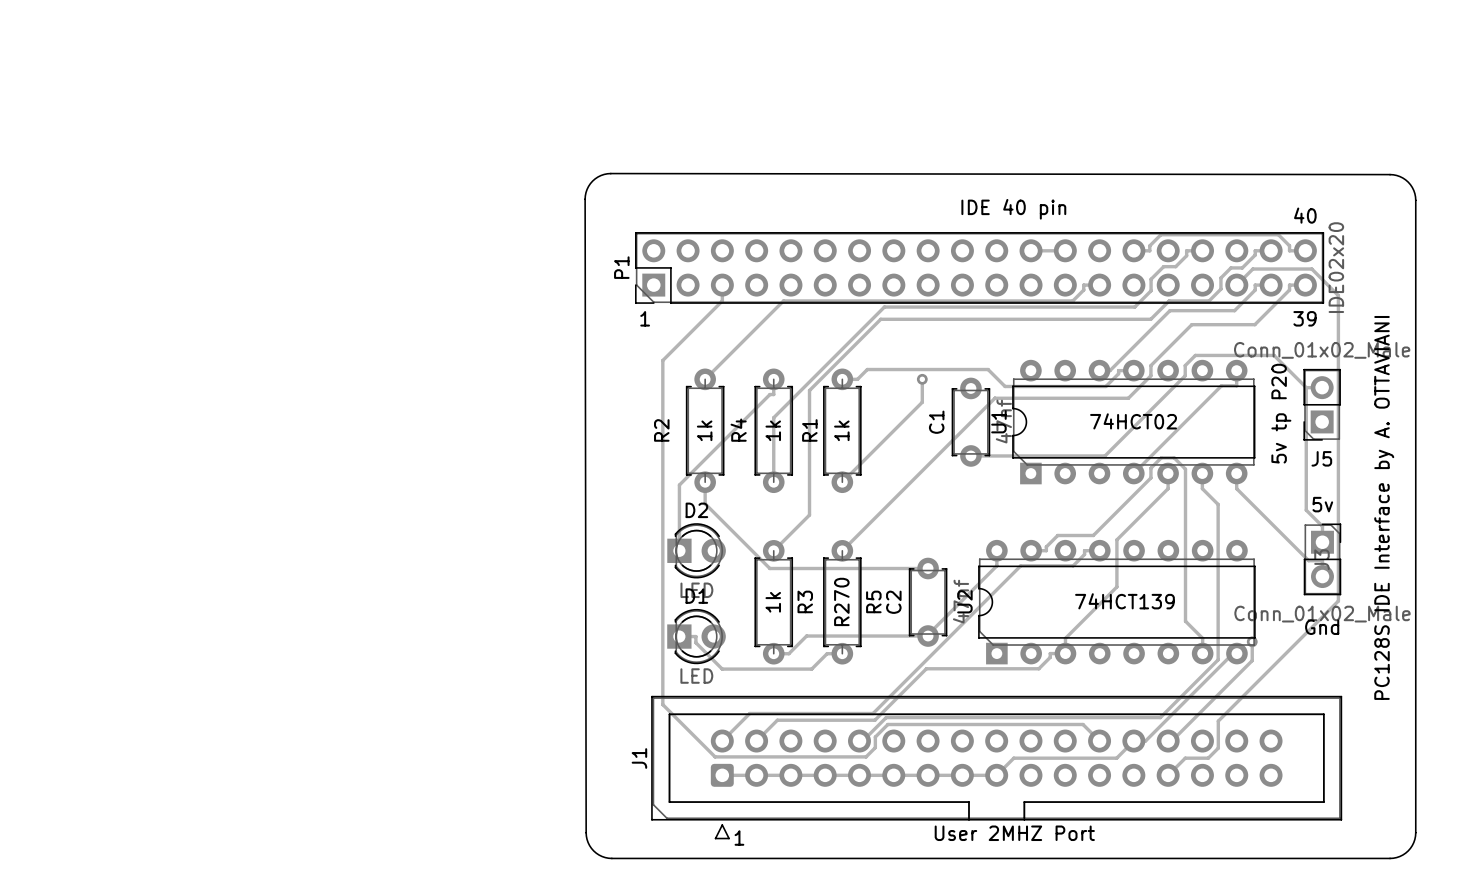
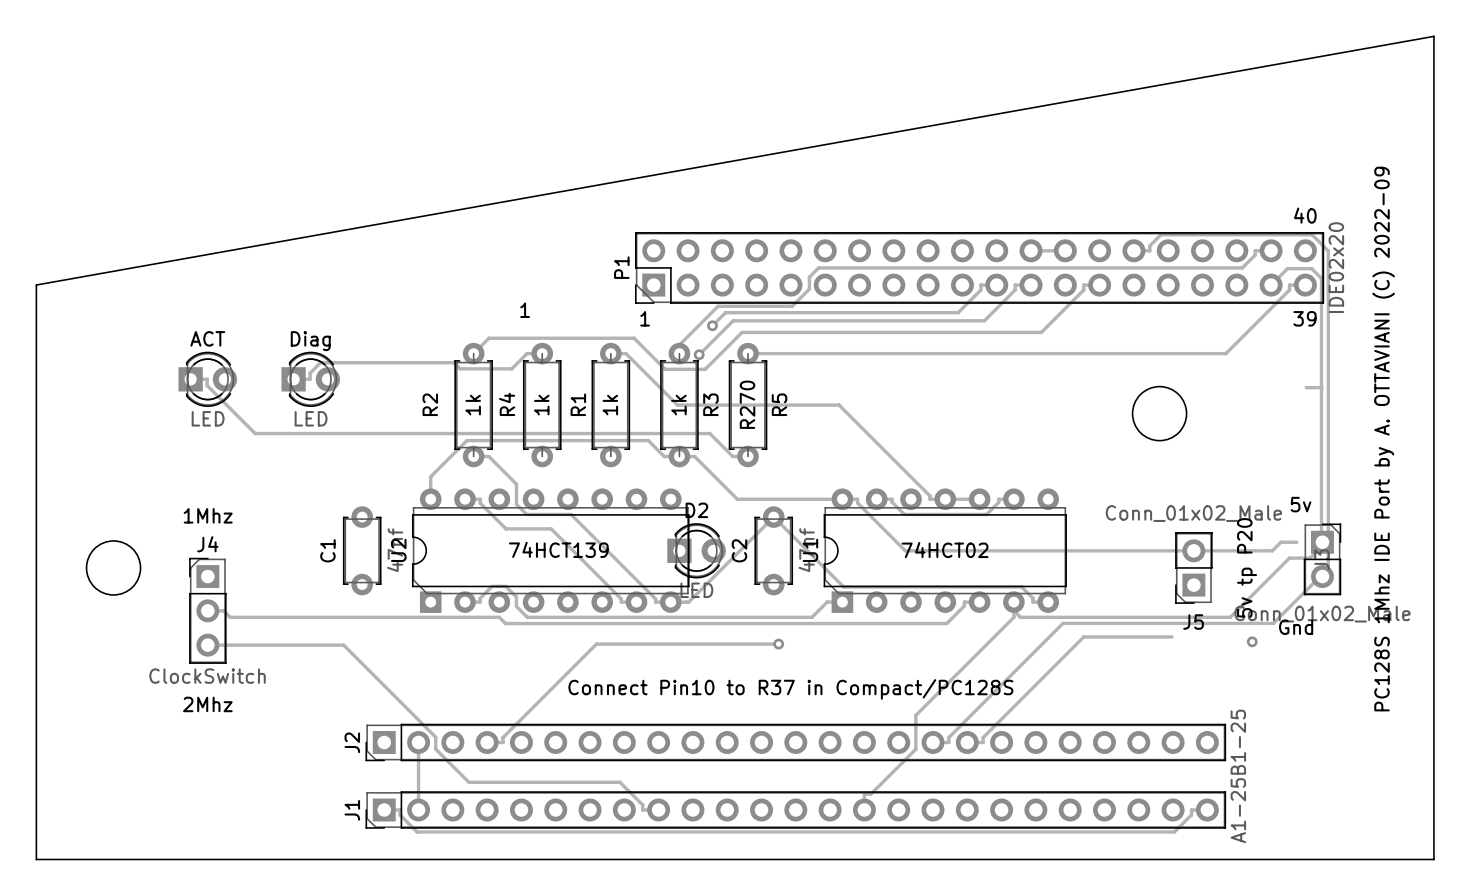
board edge: none -> (1433, 36) (1433, 859) (36, 859) (36, 285) (1433, 36)
board edge: (610, 173) (1390, 174) (1405, 179) (1412, 187) (1415, 200) (1415, 832) (1410, 848) (1402, 855) (1390, 858) (611, 858) (596, 853) (589, 845) (586, 832) (585, 199) (587, 189) (592, 181) (600, 175) (610, 173) -> none
text: IDE 40 pin (1013, 209) -> none
track: (1278, 234) (1289, 245) (1289, 250) (1305, 250) -> (1278, 234) (1312, 234) (1328, 250) (1328, 568) (1273, 623) (1063, 623) (948, 737) (948, 742) (933, 742)
track: (1202, 250) (1186, 250) (1186, 255) (1175, 266) (1163, 266) (1151, 279) (1151, 290) (1134, 307) (884, 307) (773, 417) (773, 482) -> none
track: (1230, 267) (1220, 277) (1220, 289) (1209, 300) (1169, 300) (1150, 319) (880, 319) (809, 390) (809, 515) (773, 550) -> (1230, 267) (818, 267) (809, 277) (809, 289) (792, 306) (718, 306) (679, 344) (679, 353)
track: (722, 285) (722, 300) (662, 360) (662, 704) (715, 756) (866, 756) (875, 747) (875, 737) (887, 724) (1083, 724) (1099, 741) -> none
track: none -> (996, 285) (980, 285) (980, 290) (958, 312) (725, 312) (712, 325)
track: none -> (1031, 285) (1015, 285) (1015, 290) (984, 320) (733, 320) (699, 354)
track: (1236, 285) (1252, 269) (1311, 269) (1338, 295) (1338, 601) (1218, 721) (1218, 748) (1208, 758) (1185, 758) (1168, 775) -> none
track: (1271, 285) (1255, 285) (1255, 290) (1234, 310) (1169, 310) (1110, 370) (1099, 370) -> (1271, 285) (1287, 268) (1311, 268) (1321, 278) (1321, 546) (1310, 558) (1289, 558) (1230, 617) (1020, 617) (1013, 610)
track: (1072, 300) (783, 300) (705, 379) -> (1072, 300) (1041, 332) (742, 332) (705, 369) (665, 369) (634, 338) (489, 338) (473, 353)
text: none -> 1 (525, 310)
track: (1254, 324) (1191, 324) (1150, 365) (1150, 375) (1128, 398) (994, 398) (842, 550) -> (1254, 324) (1225, 353) (748, 353)
via: none -> (712, 325)
track: none -> (542, 353) (527, 353) (511, 368) (460, 368) (453, 362) (320, 362) (310, 373) (310, 379) (293, 379)
track: none -> (610, 353) (626, 353) (677, 405) (839, 405) (930, 496) (930, 499) (979, 499)
via: none -> (699, 354)
track: (1133, 370) (1118, 370) (1118, 373) (1105, 386) (1005, 386) (988, 369) (867, 369) (857, 379) (842, 379) -> none
track: (1236, 370) (1236, 385) (1221, 385) (1133, 473) -> none
track: none -> (190, 379) (207, 379) (207, 385) (255, 433) (709, 433) (732, 456) (748, 456)
ACT: none -> LED (207, 379)
Diag: none -> LED (310, 379)
track: (773, 379) (773, 394) (769, 394) (679, 485) (679, 550) -> none
track: (922, 379) (922, 402) (842, 482) -> none
via: (922, 379) -> none
round board edge: none -> [1132, 386, 1187, 441]
J5 position: (1322, 404) -> (1193, 567)
text position: 5v tp P20 (1281, 413) -> 5v tp P20 (1247, 567)
C1 position: (970, 422) -> (362, 550)
U1 position: (1133, 422) -> (945, 550)
R2 position: (705, 430) -> (473, 405)
R4 position: (773, 430) -> (542, 405)
R1 position: (842, 430) -> (610, 405)
track: (970, 455) (1105, 455) (1185, 375) (1185, 365) (1195, 355) (1274, 355) (1306, 387) (1306, 510) (1322, 526) (1322, 542) -> none
track: none -> (473, 456) (488, 456) (516, 484) (516, 504) (526, 514) (571, 514) (655, 598) (655, 602) (688, 602) (773, 517) (843, 586) (1021, 586) (1032, 598) (1032, 602) (1048, 602)
track: (1168, 473) (1168, 488) (1116, 539) (1116, 586) (1065, 638) (1065, 653) (1050, 653) (1050, 657) (1038, 668) (926, 668) (874, 720) (777, 720) (756, 741) -> none
track: (1202, 473) (1202, 488) (1218, 504) (1218, 659) (1160, 717) (886, 717) (862, 741) (859, 741) -> none
track: (1236, 473) (1236, 488) (1308, 560) (1322, 560) (1322, 576) -> none
track: (705, 482) (705, 503) (769, 568) (928, 568) -> none
track: none -> (430, 499) (430, 476) (466, 440) (648, 440) (664, 456) (694, 456) (737, 499) (857, 499) (857, 503) (905, 550) (1272, 550) (1280, 542) (1296, 542)
track: none -> (465, 499) (480, 499) (480, 503) (506, 528) (551, 528) (621, 598) (621, 602) (636, 602)
track: none -> (876, 499) (891, 499) (891, 501) (904, 514) (986, 514) (998, 502) (998, 499) (1013, 499)
text position: 5v (1322, 504) -> 5v (1301, 504)
text: PC128S IDE Interface by A. OTTAVIANI (1384, 507) -> PC128S 1Mhz IDE Port by A. OTTAVIANI (C) 2022-09 (1383, 439)
text: none -> 1Mhz (208, 515)
round board edge: none -> [86, 540, 141, 596]
track: (996, 550) (996, 565) (928, 636) (806, 636) (788, 653) (773, 653) -> none
track: (1031, 550) (1046, 550) (1046, 546) (1057, 535) (1093, 535) (1150, 477) (1150, 468) (1161, 457) (1174, 457) (1185, 469) (1185, 621) (1202, 638) (1202, 653) -> none
track: (1099, 550) (1084, 550) (1084, 554) (1073, 565) (1020, 565) (873, 713) (749, 713) (722, 741) -> none
track: none -> (465, 602) (480, 602) (480, 598) (492, 586) (505, 586) (516, 597) (516, 606) (527, 617) (812, 617) (827, 602) (842, 602)
R3 position: (773, 602) -> (679, 405)
R5 position: (842, 602) -> (748, 405)
C2 position: (928, 602) -> (773, 550)
track: none -> (979, 602) (964, 602) (964, 605) (946, 623) (505, 623) (499, 617) (230, 617) (223, 610) (207, 610)
track: none -> (1013, 602) (1013, 617) (915, 715) (915, 749) (870, 794) (864, 794) (864, 810)
U2 position: (1116, 602) -> (550, 550)
J4: none -> ClockSwitch (207, 610)
text position: Gnd (1322, 627) -> Gnd (1296, 627)
track: (679, 636) (695, 636) (695, 642) (722, 669) (811, 669) (827, 653) (842, 653) -> none
D1: LED (696, 636) -> none
track: none -> (1171, 636) (1083, 636) (983, 737) (983, 742) (967, 742)
track: (1252, 641) (1252, 660) (1171, 741) (1168, 741) -> none
track: none -> (778, 644) (596, 644) (503, 737) (503, 742) (487, 742)
via: none -> (778, 644)
track: none -> (207, 645) (343, 645) (435, 737) (435, 749) (468, 782) (620, 782) (642, 805) (642, 810) (658, 810)
track: (1236, 653) (1233, 653) (1145, 741) (1133, 741) (1116, 758) (1013, 758) (996, 775) (722, 775) -> none
text: none -> Connect Pin10 to R37 in Compact/PC128S (790, 689)
J1 footprint: [651, 695, 1343, 840] -> [365, 791, 1227, 829]
text: none -> 2Mhz (207, 704)
track: none -> (418, 742) (418, 810)
J2: none -> B1-25 (795, 742)
J1 name position: J1 (639, 758) -> J1 (352, 810)
track: none -> (384, 810) (400, 810) (400, 814) (417, 831) (1174, 831) (1191, 814) (1191, 810) (1207, 810)
J1 value: User 2MHZ Port (1014, 833) -> A1-25 (1238, 810)
text: 1 (739, 838) -> none

